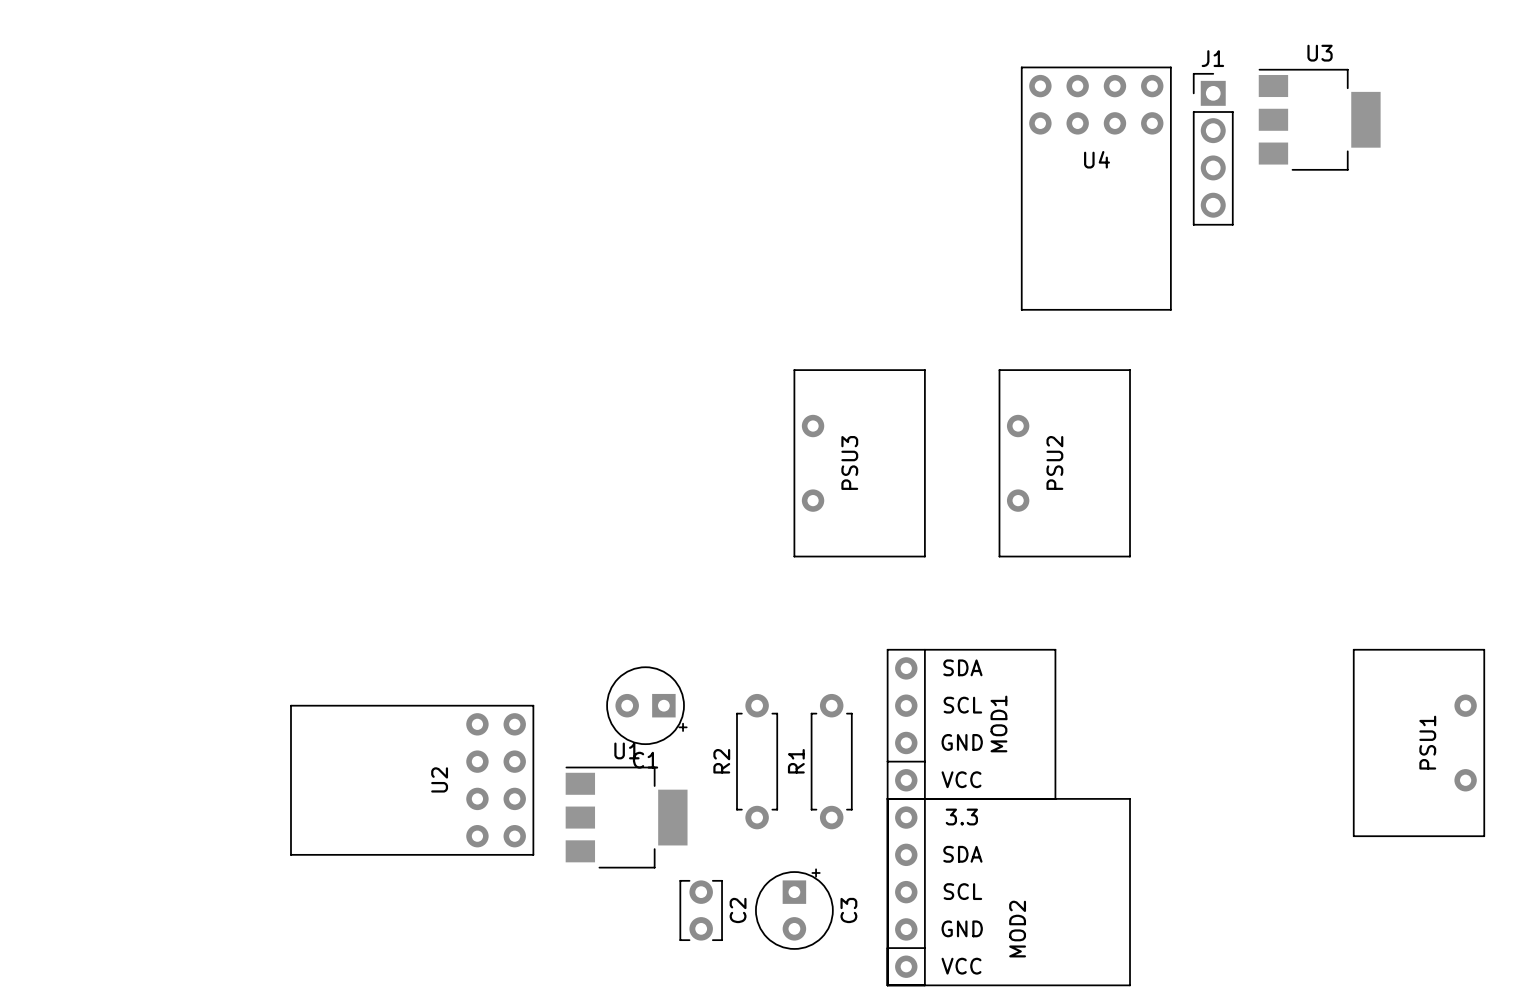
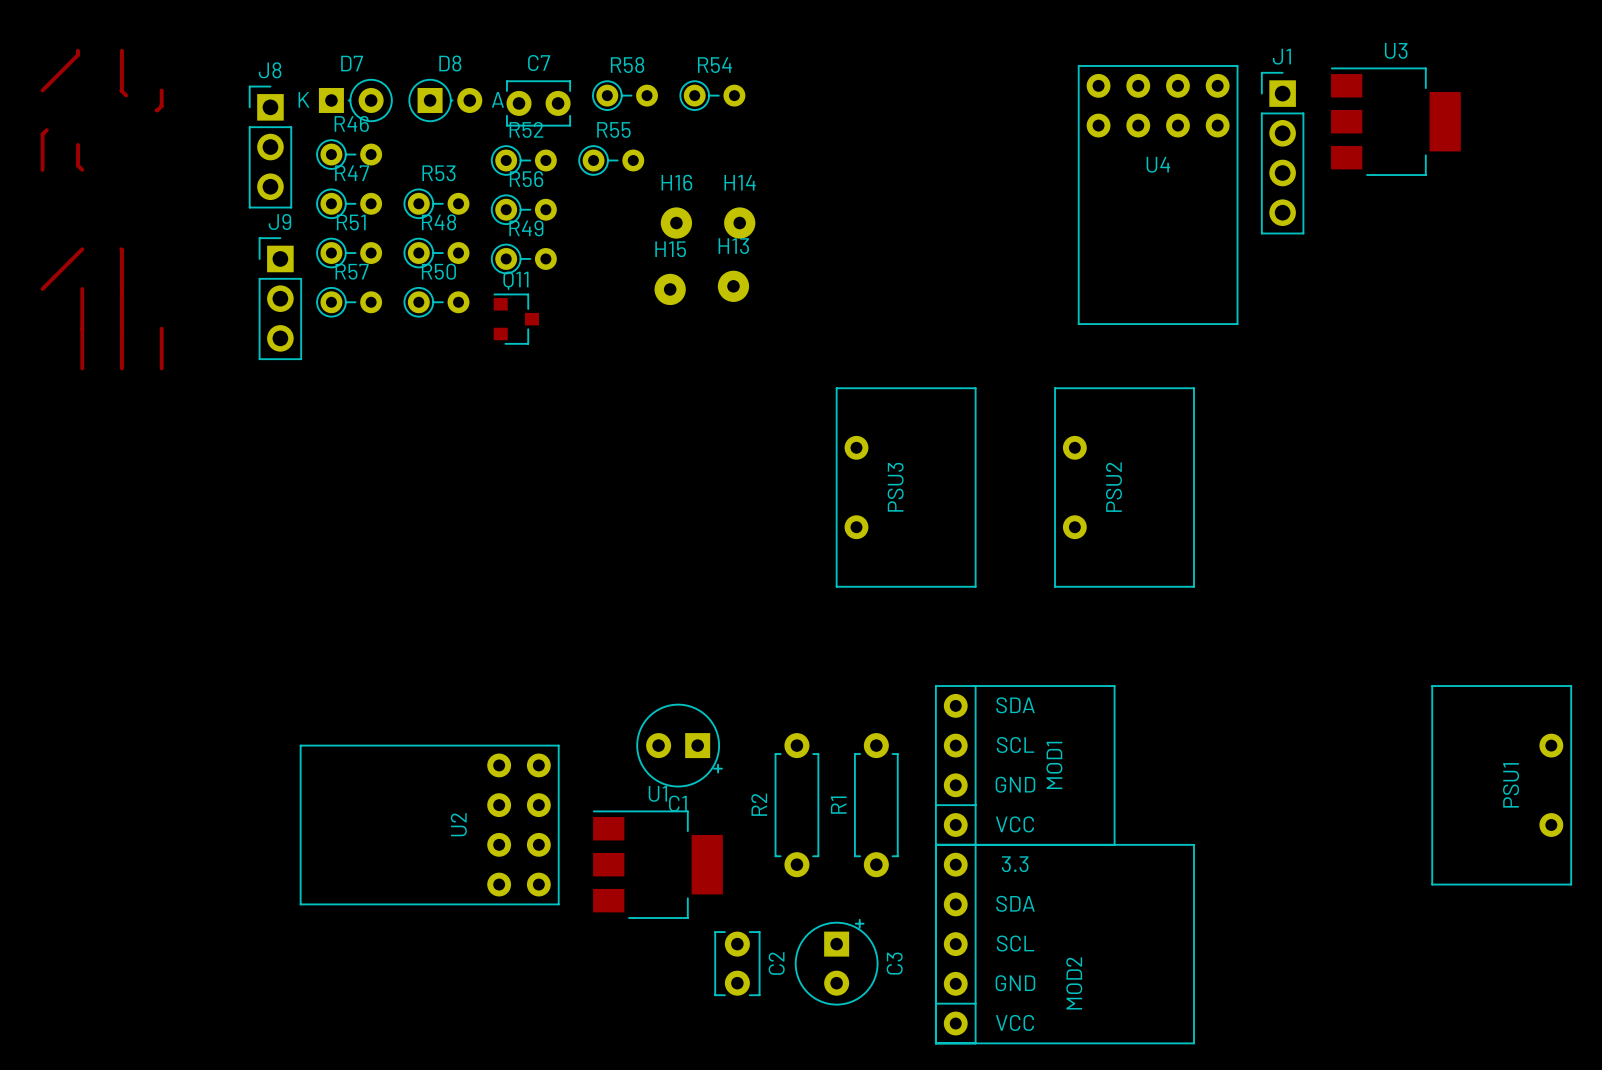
track: none -> (78, 50) (78, 54) (42, 90)
track: none -> (121, 50) (121, 91)
track: none -> (121, 90) (126, 95)
track: none -> (161, 90) (161, 106) (156, 110)
R58: none -> (624, 95)
R54: none -> (712, 95)
D7: none -> (355, 100)
D8: none -> (445, 100)
C7: none -> (538, 103)
track: none -> (46, 130) (42, 134) (42, 169)
track: none -> (78, 145) (78, 165) (82, 169)
J8: none -> (270, 147)
R46: none -> (349, 154)
R52: none -> (523, 160)
R55: none -> (611, 160)
R47: none -> (349, 203)
R53: none -> (436, 203)
R56: none -> (523, 209)
H16: none -> (676, 223)
H14: none -> (739, 223)
track: none -> (82, 249) (42, 288)
track: none -> (121, 249) (121, 368)
R51: none -> (349, 253)
R48: none -> (436, 253)
R49: none -> (523, 258)
H13: none -> (733, 286)
track: none -> (82, 288) (82, 368)
H15: none -> (670, 289)
J9: none -> (280, 298)
R57: none -> (349, 302)
R50: none -> (436, 302)
Q11: none -> (516, 319)
track: none -> (161, 328) (161, 368)

